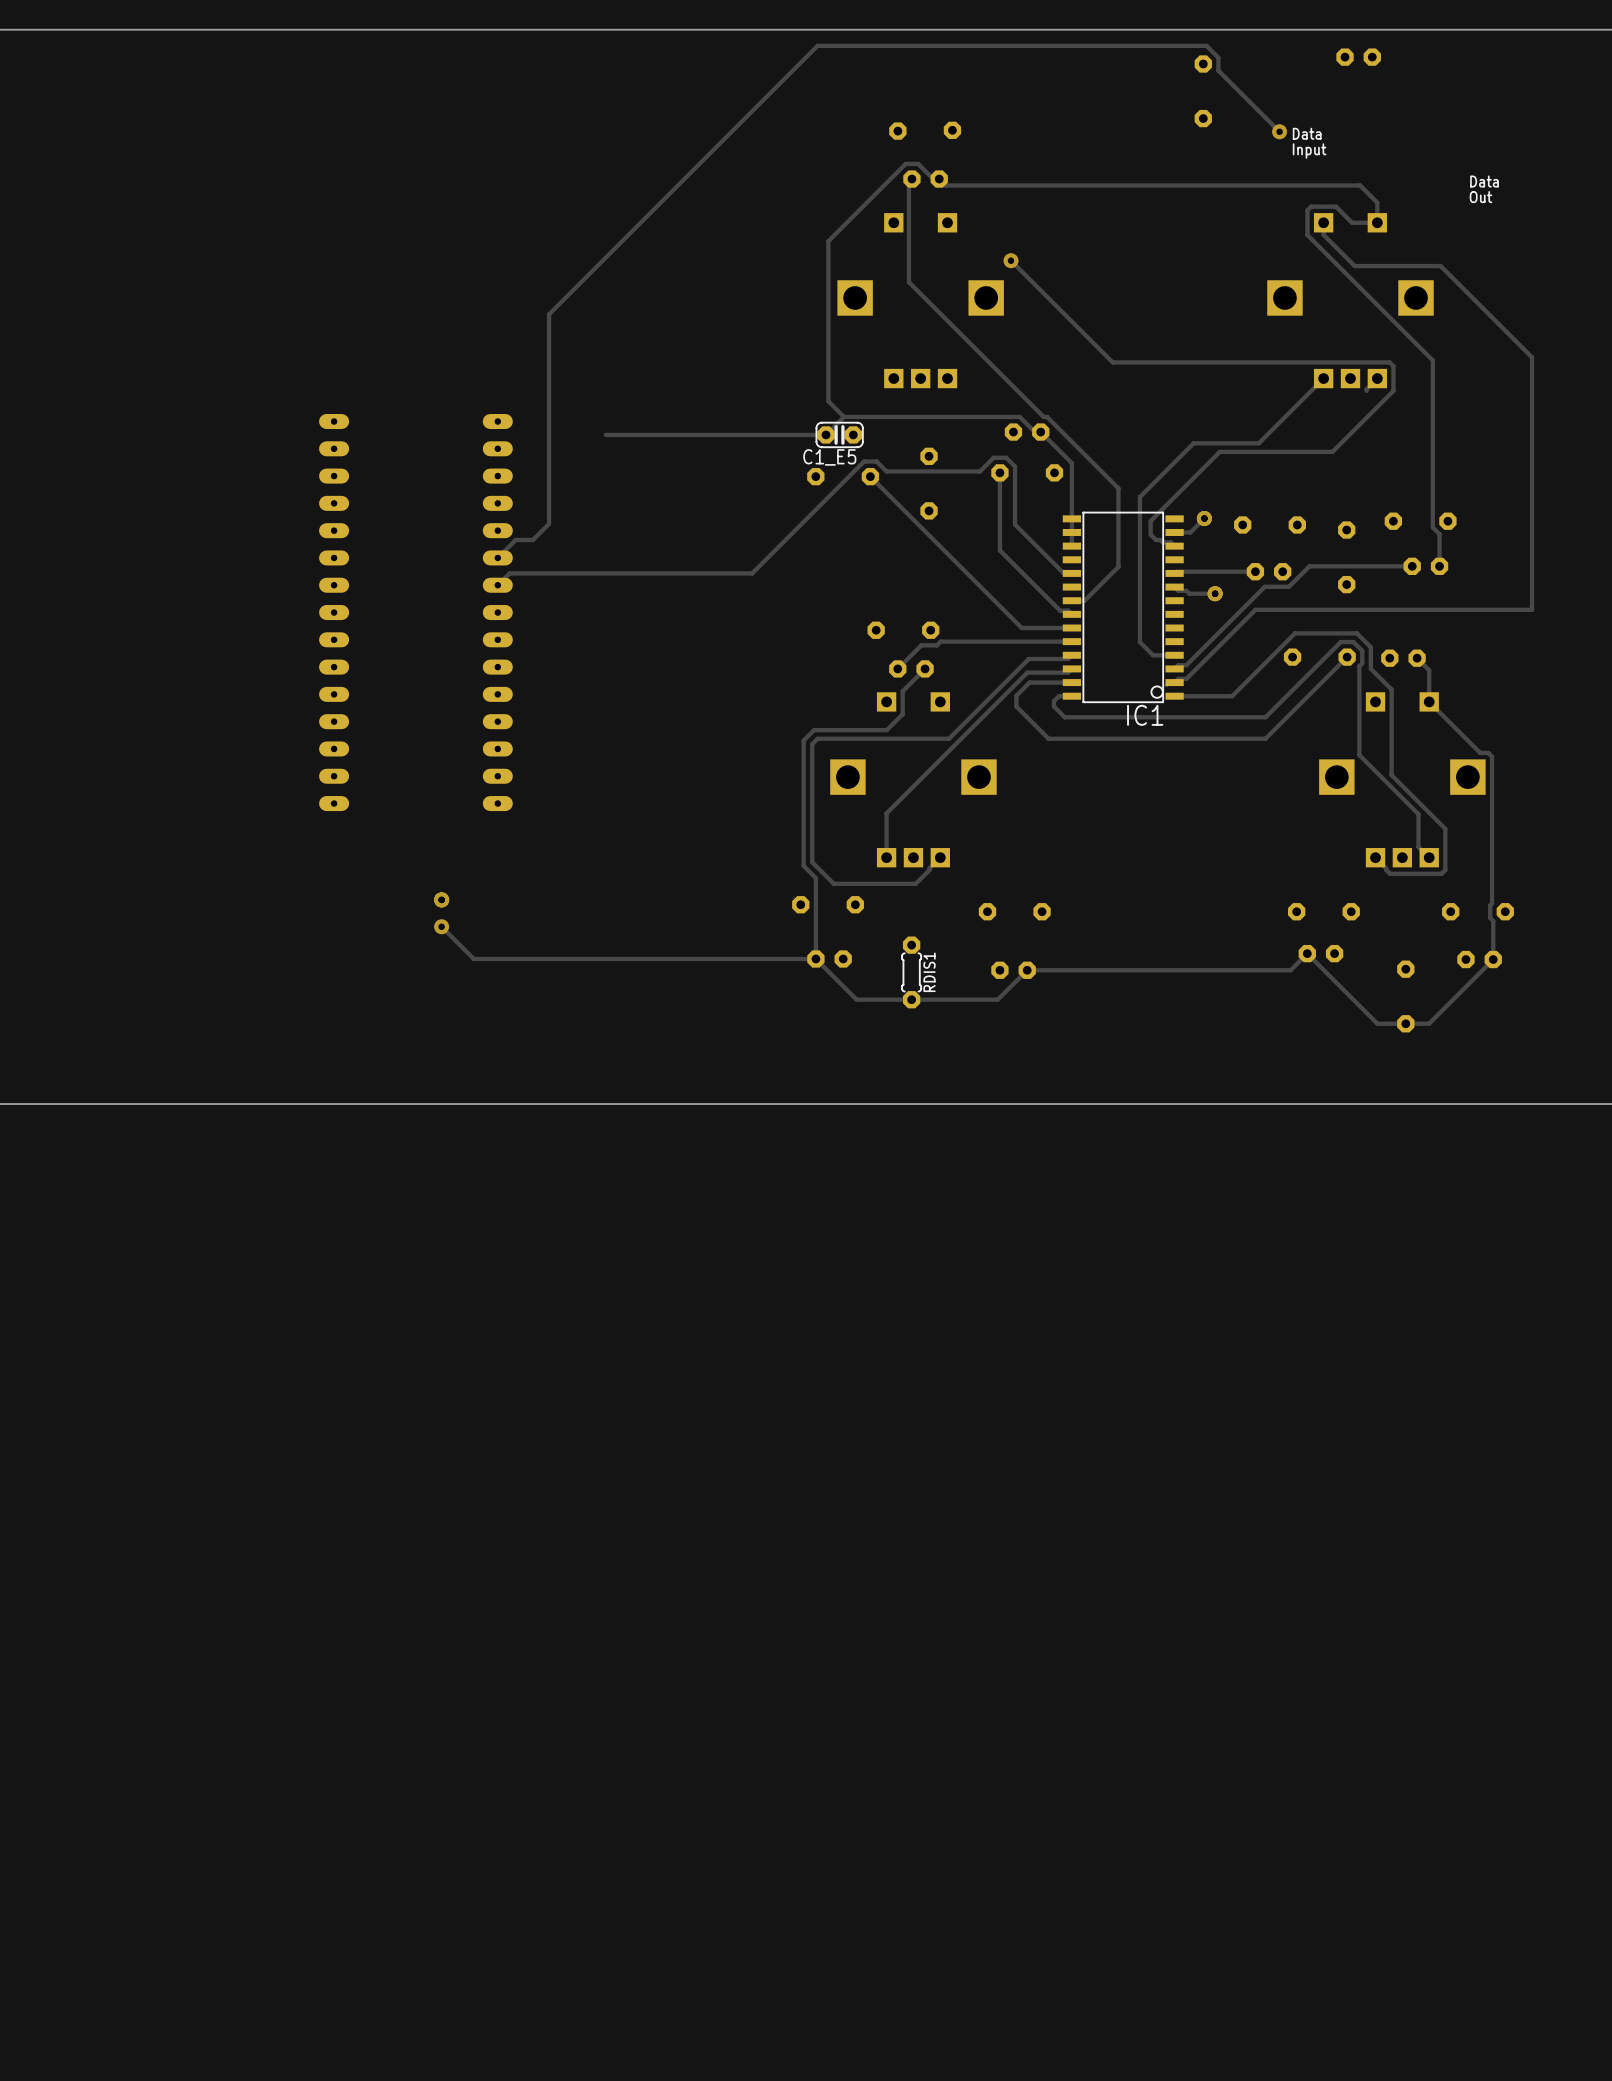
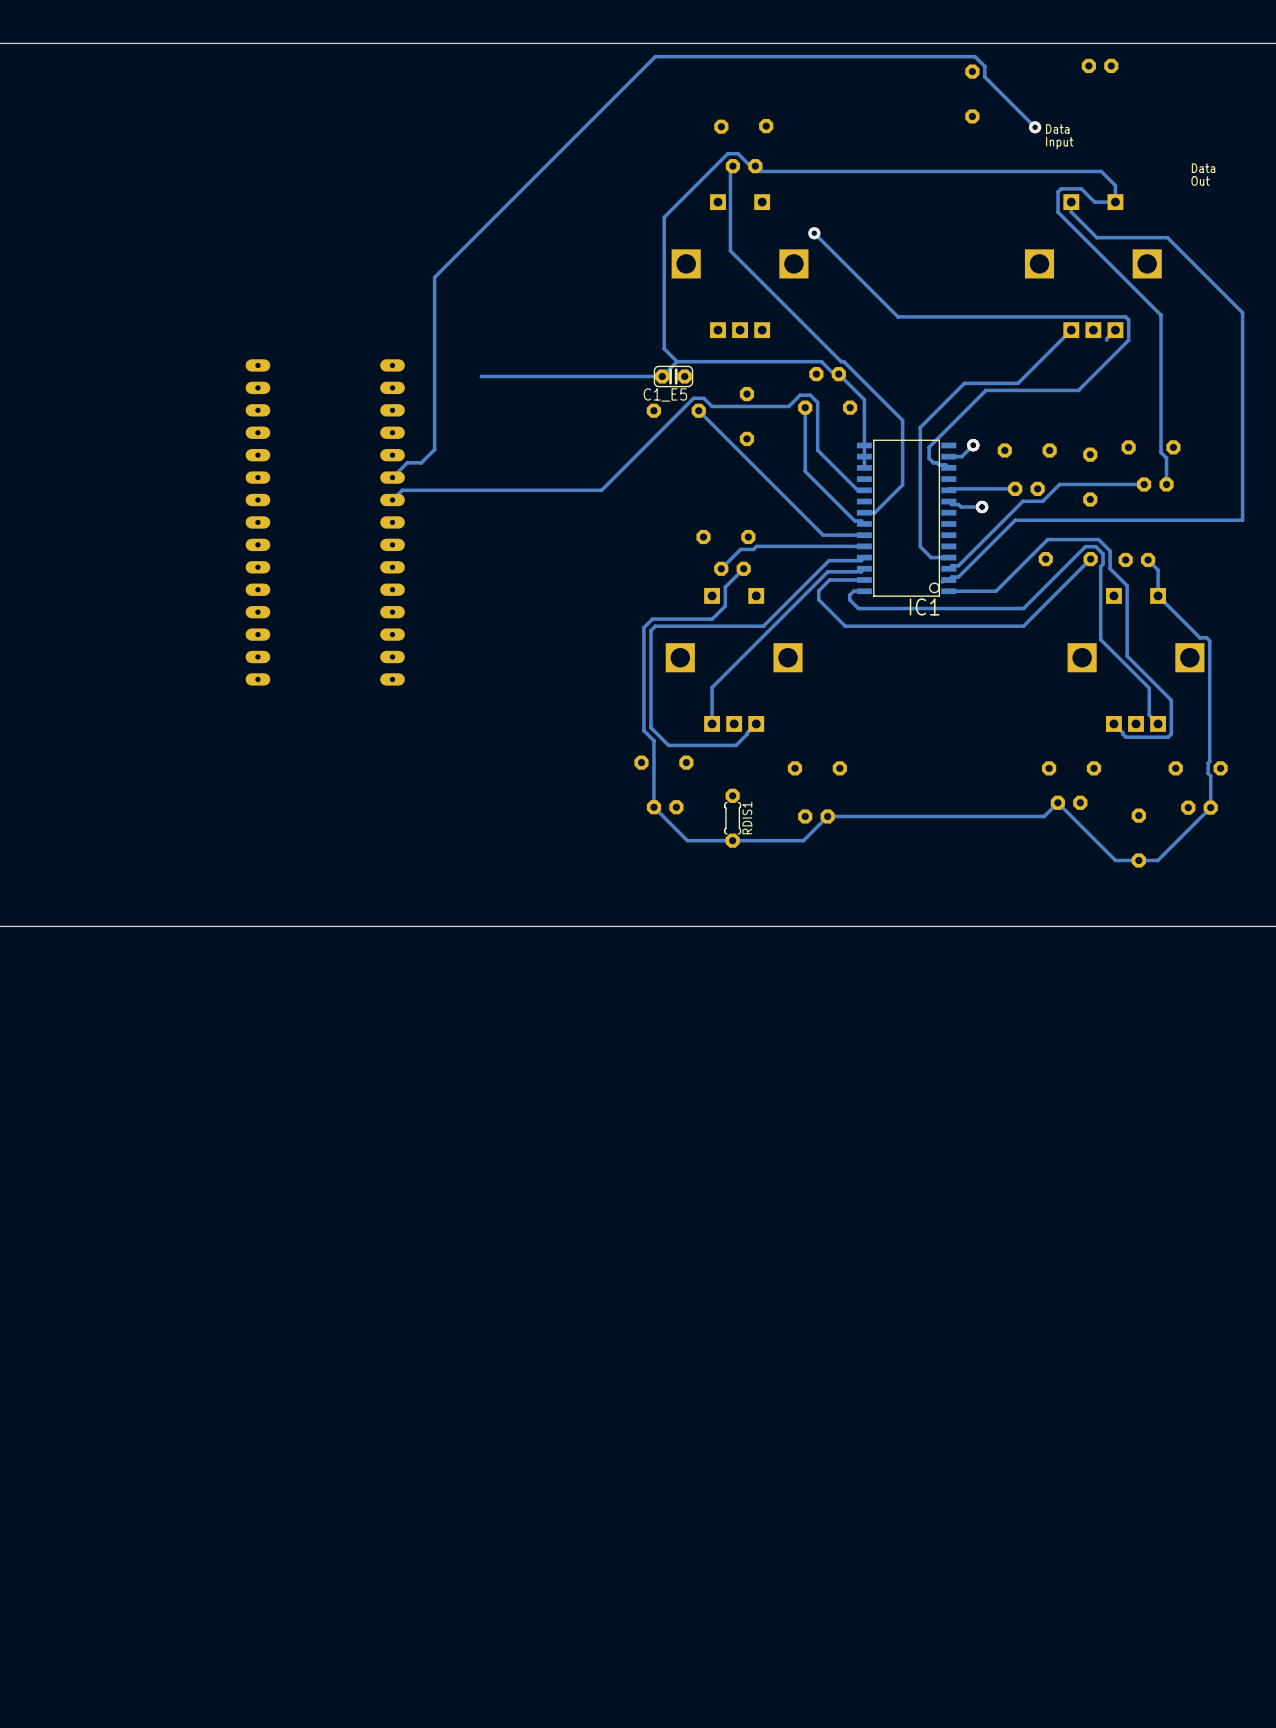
via: (441, 899) -> none
track: (441, 926) (473, 958) (815, 958) -> none
via: (441, 926) -> none

